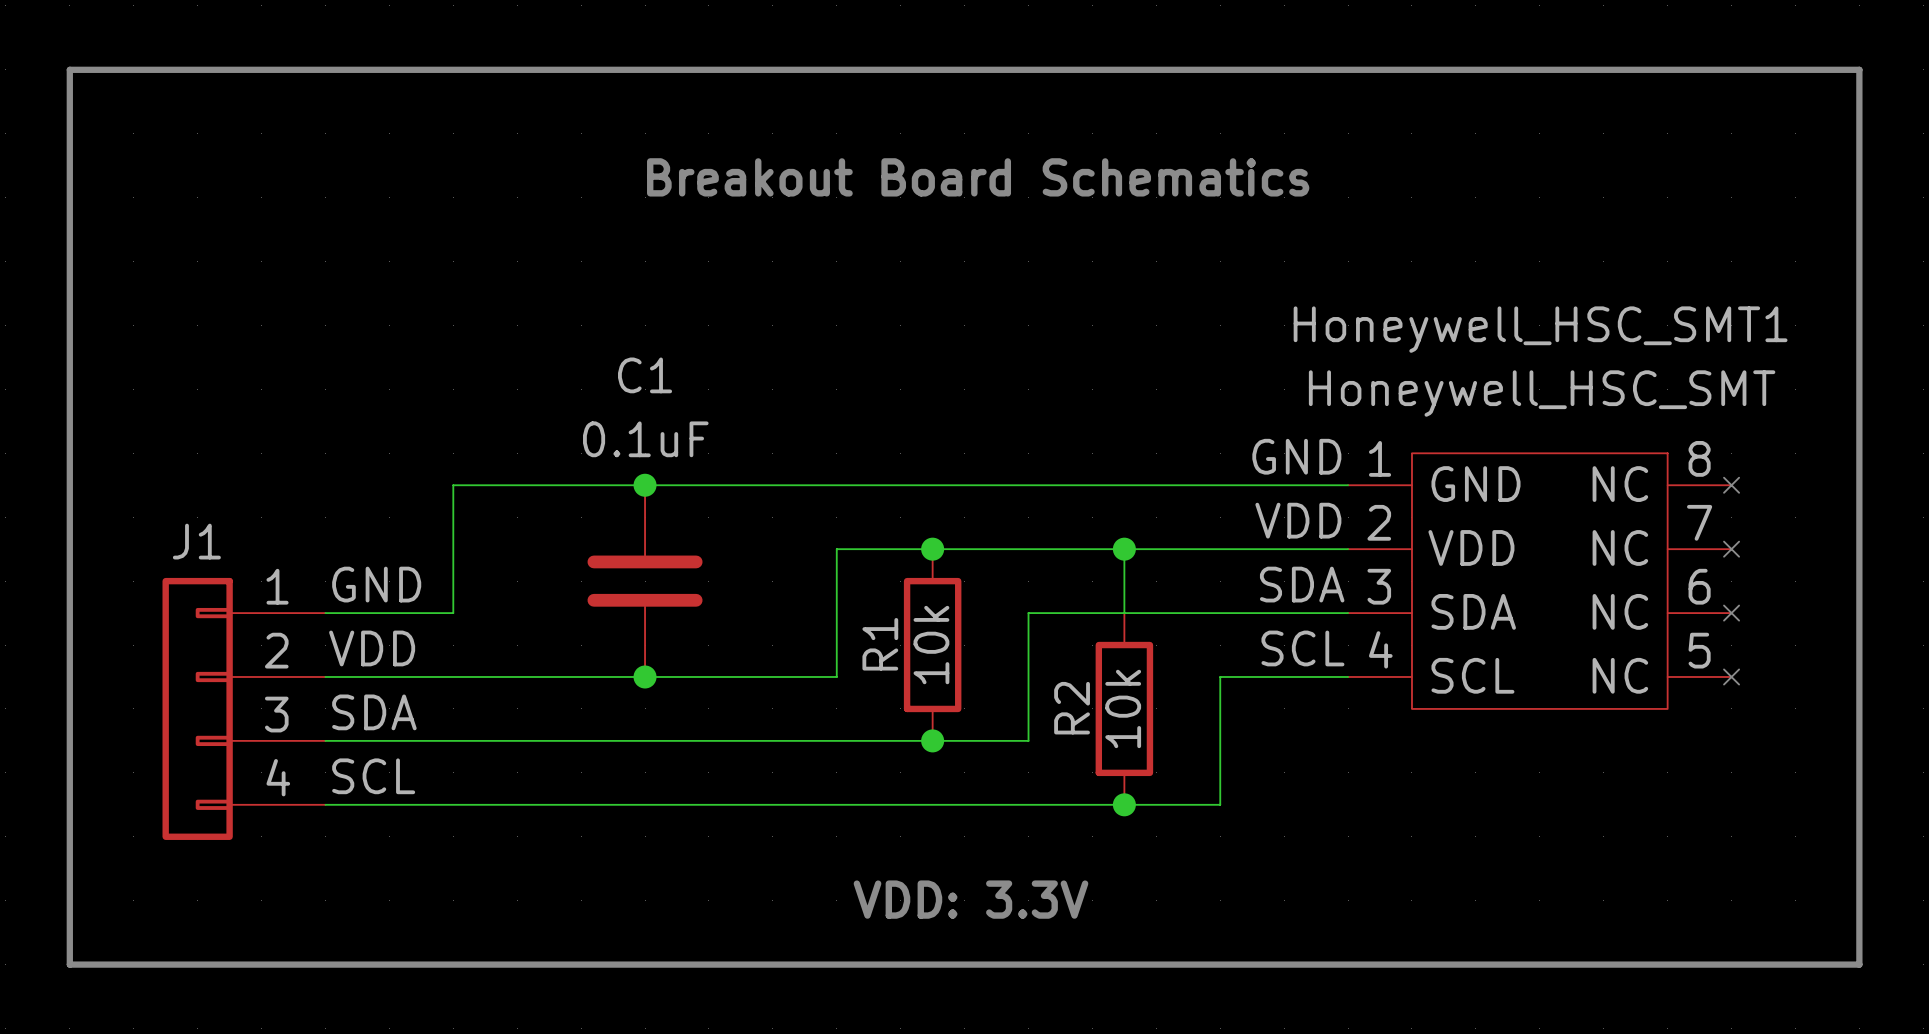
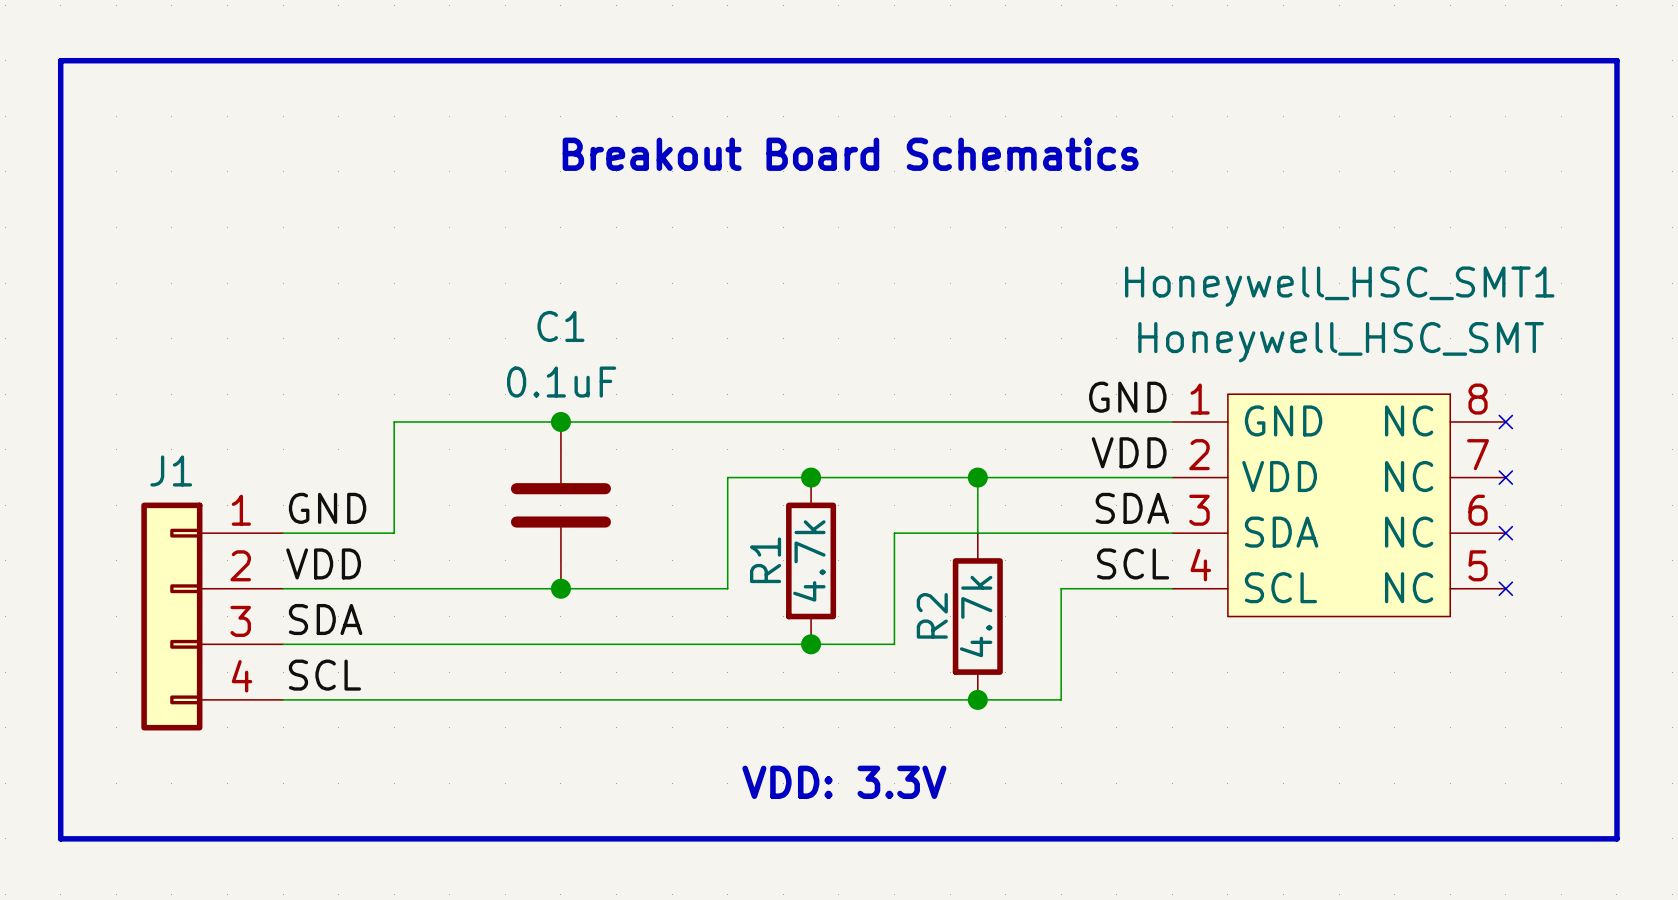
R1 value: 10k (931, 645) -> 4.7k (809, 560)
R2 value: 10k (1123, 708) -> 4.7k (976, 616)

